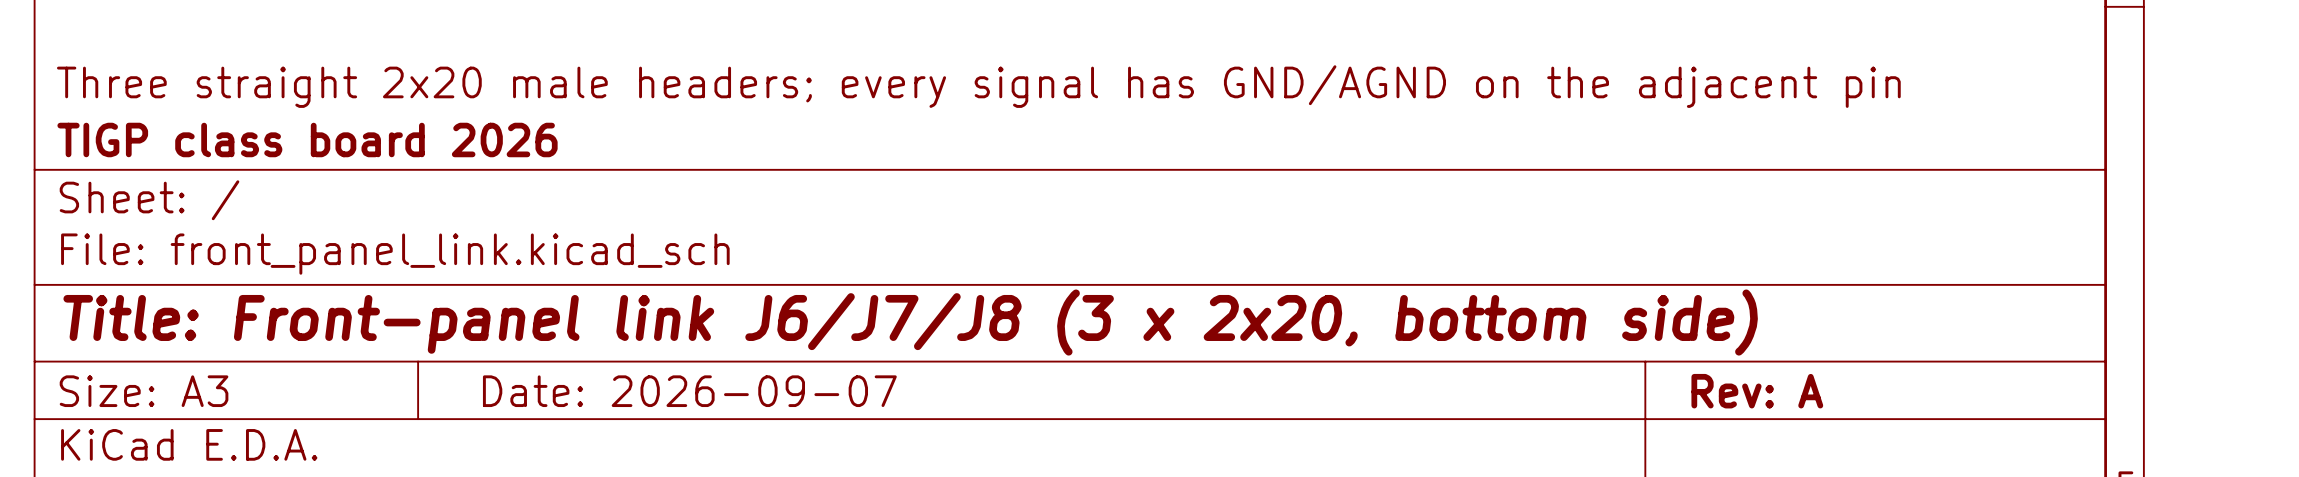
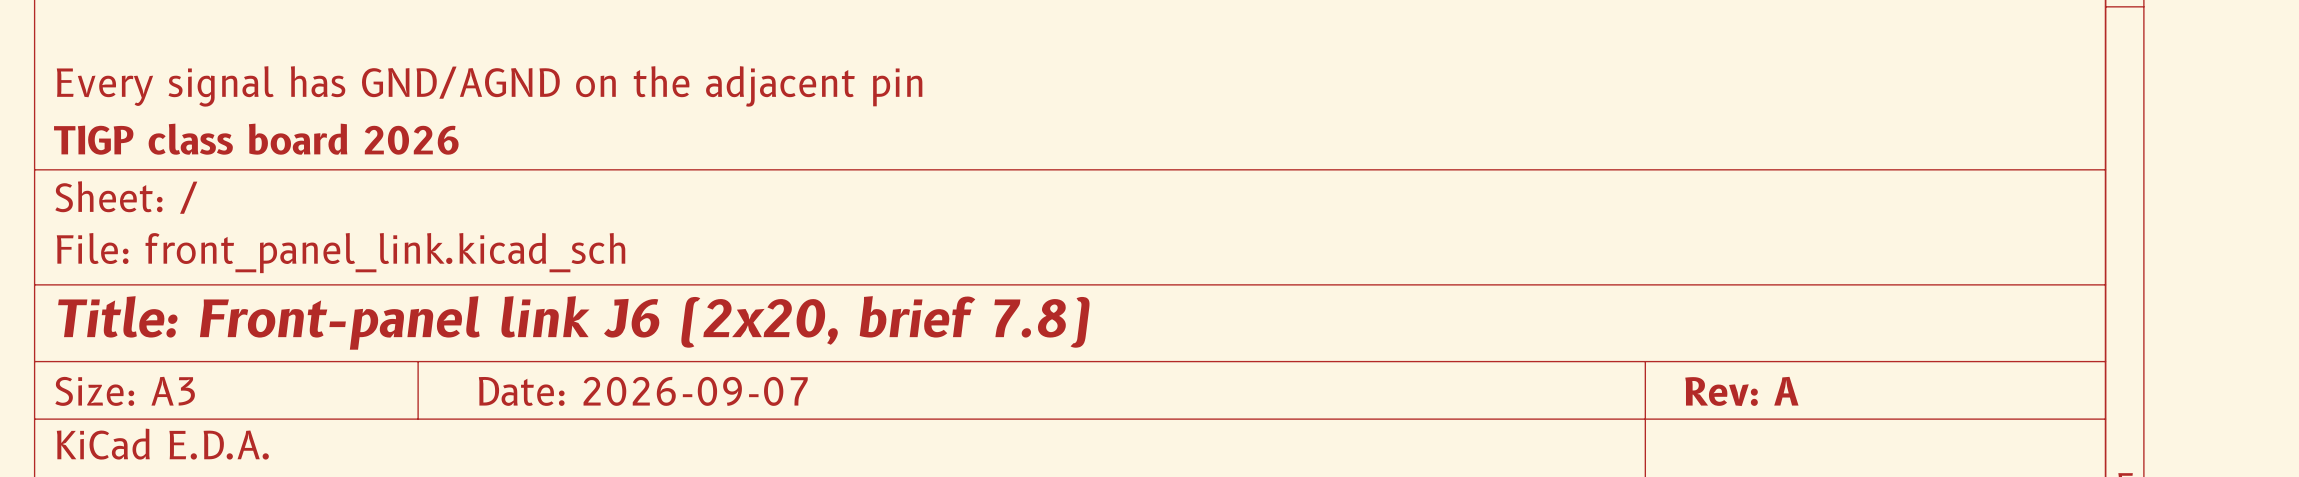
title block: Three straight 2x20 male headers; every signal has GND/AGND on the adjacent pin (978, 86) -> Every signal has GND/AGND on the adjacent pin (489, 86)
title block: Title: Front-panel link J6/J7/J8 (3 x 2x20, bottom side) (910, 322) -> Title: Front-panel link J6 (2x20, brief 7.8) (573, 322)

